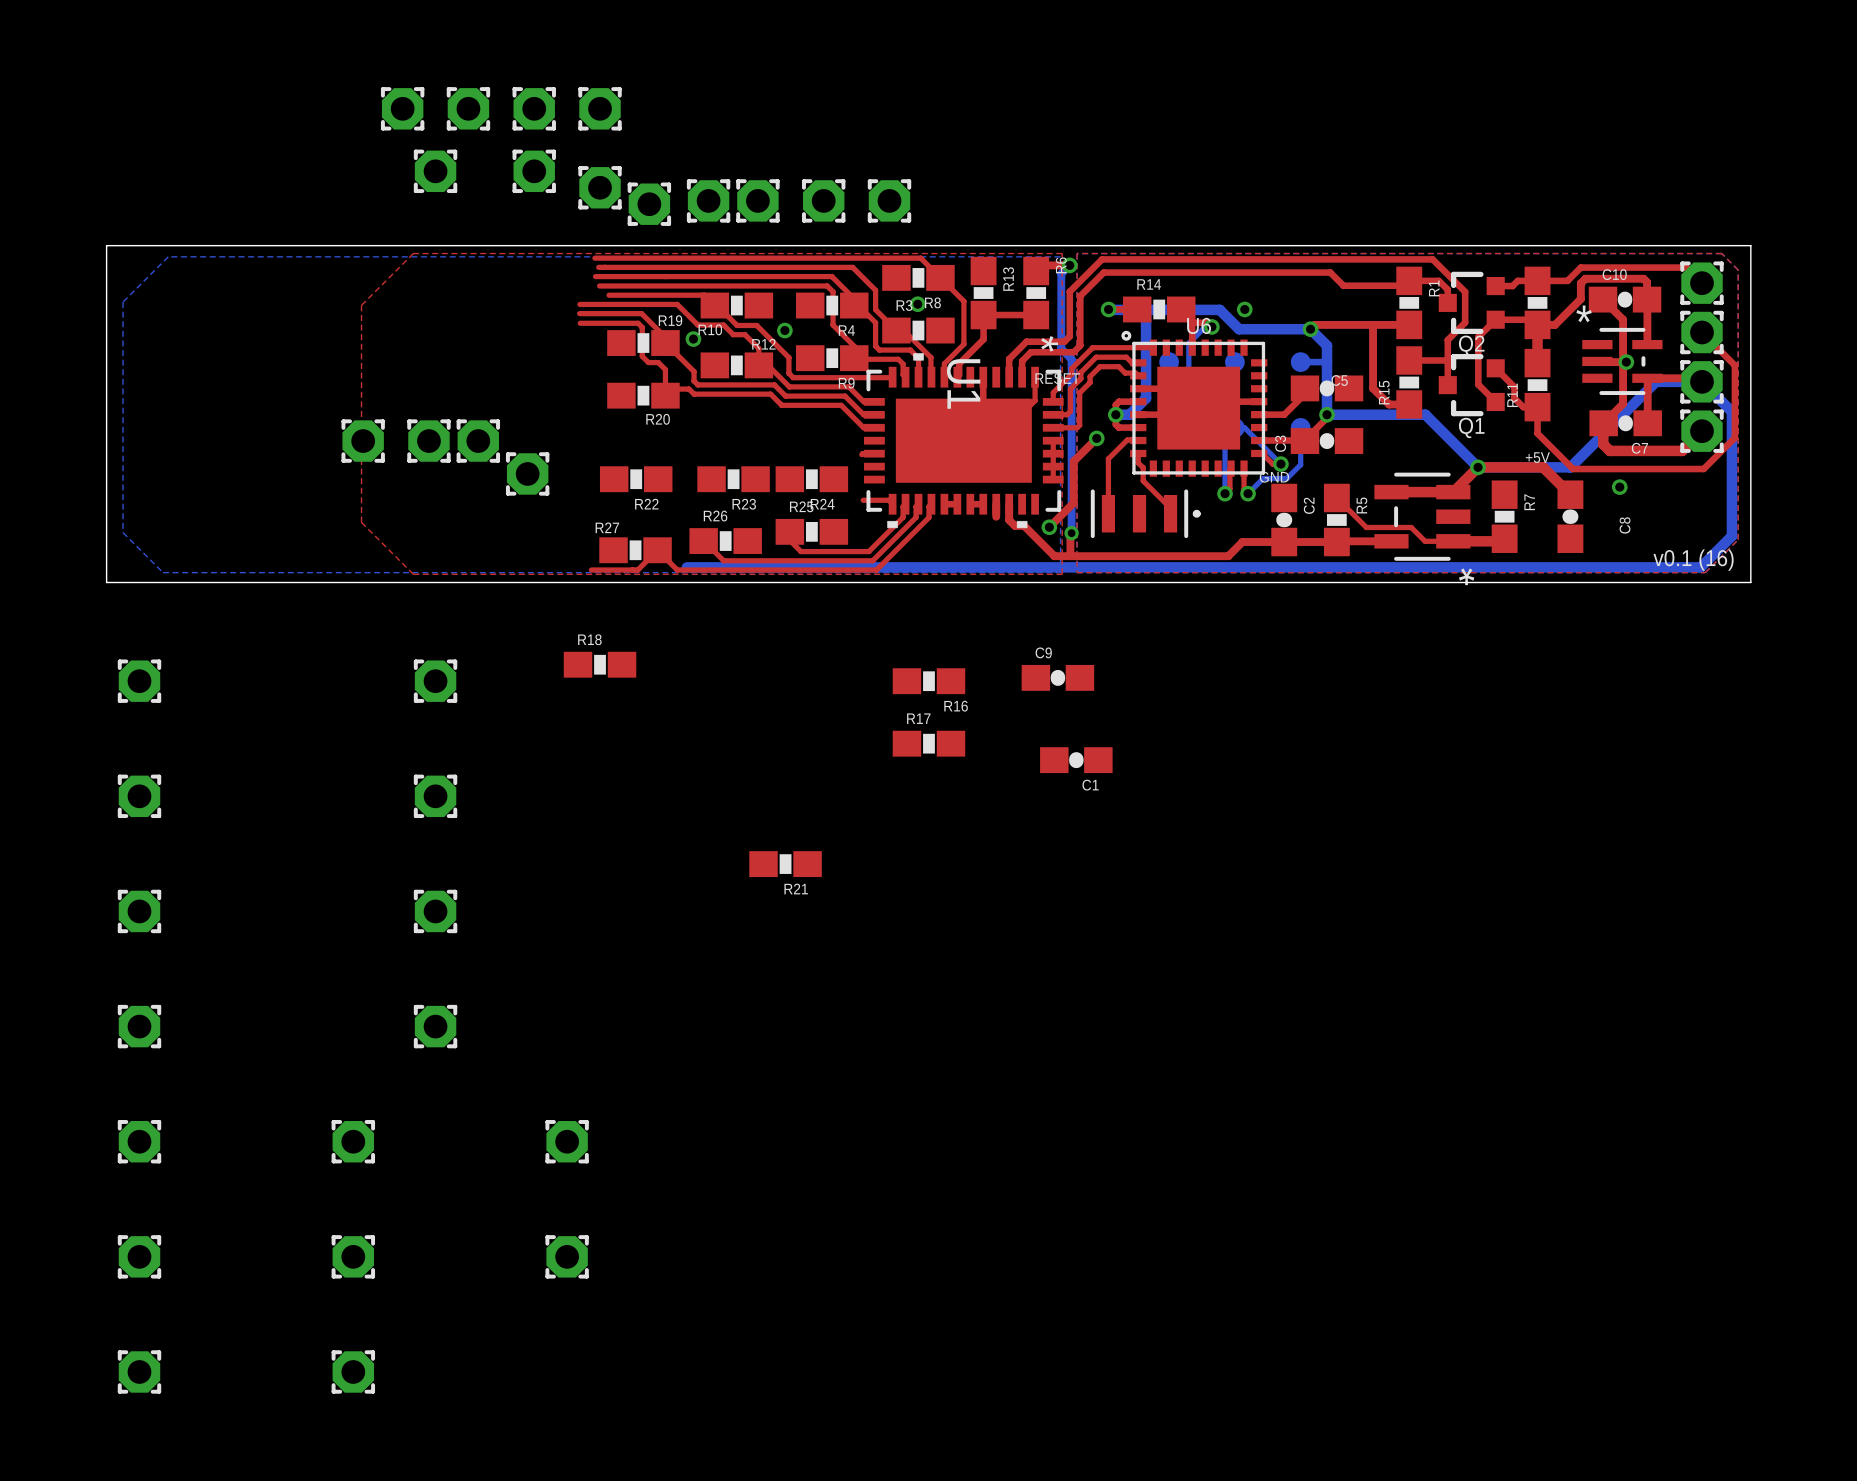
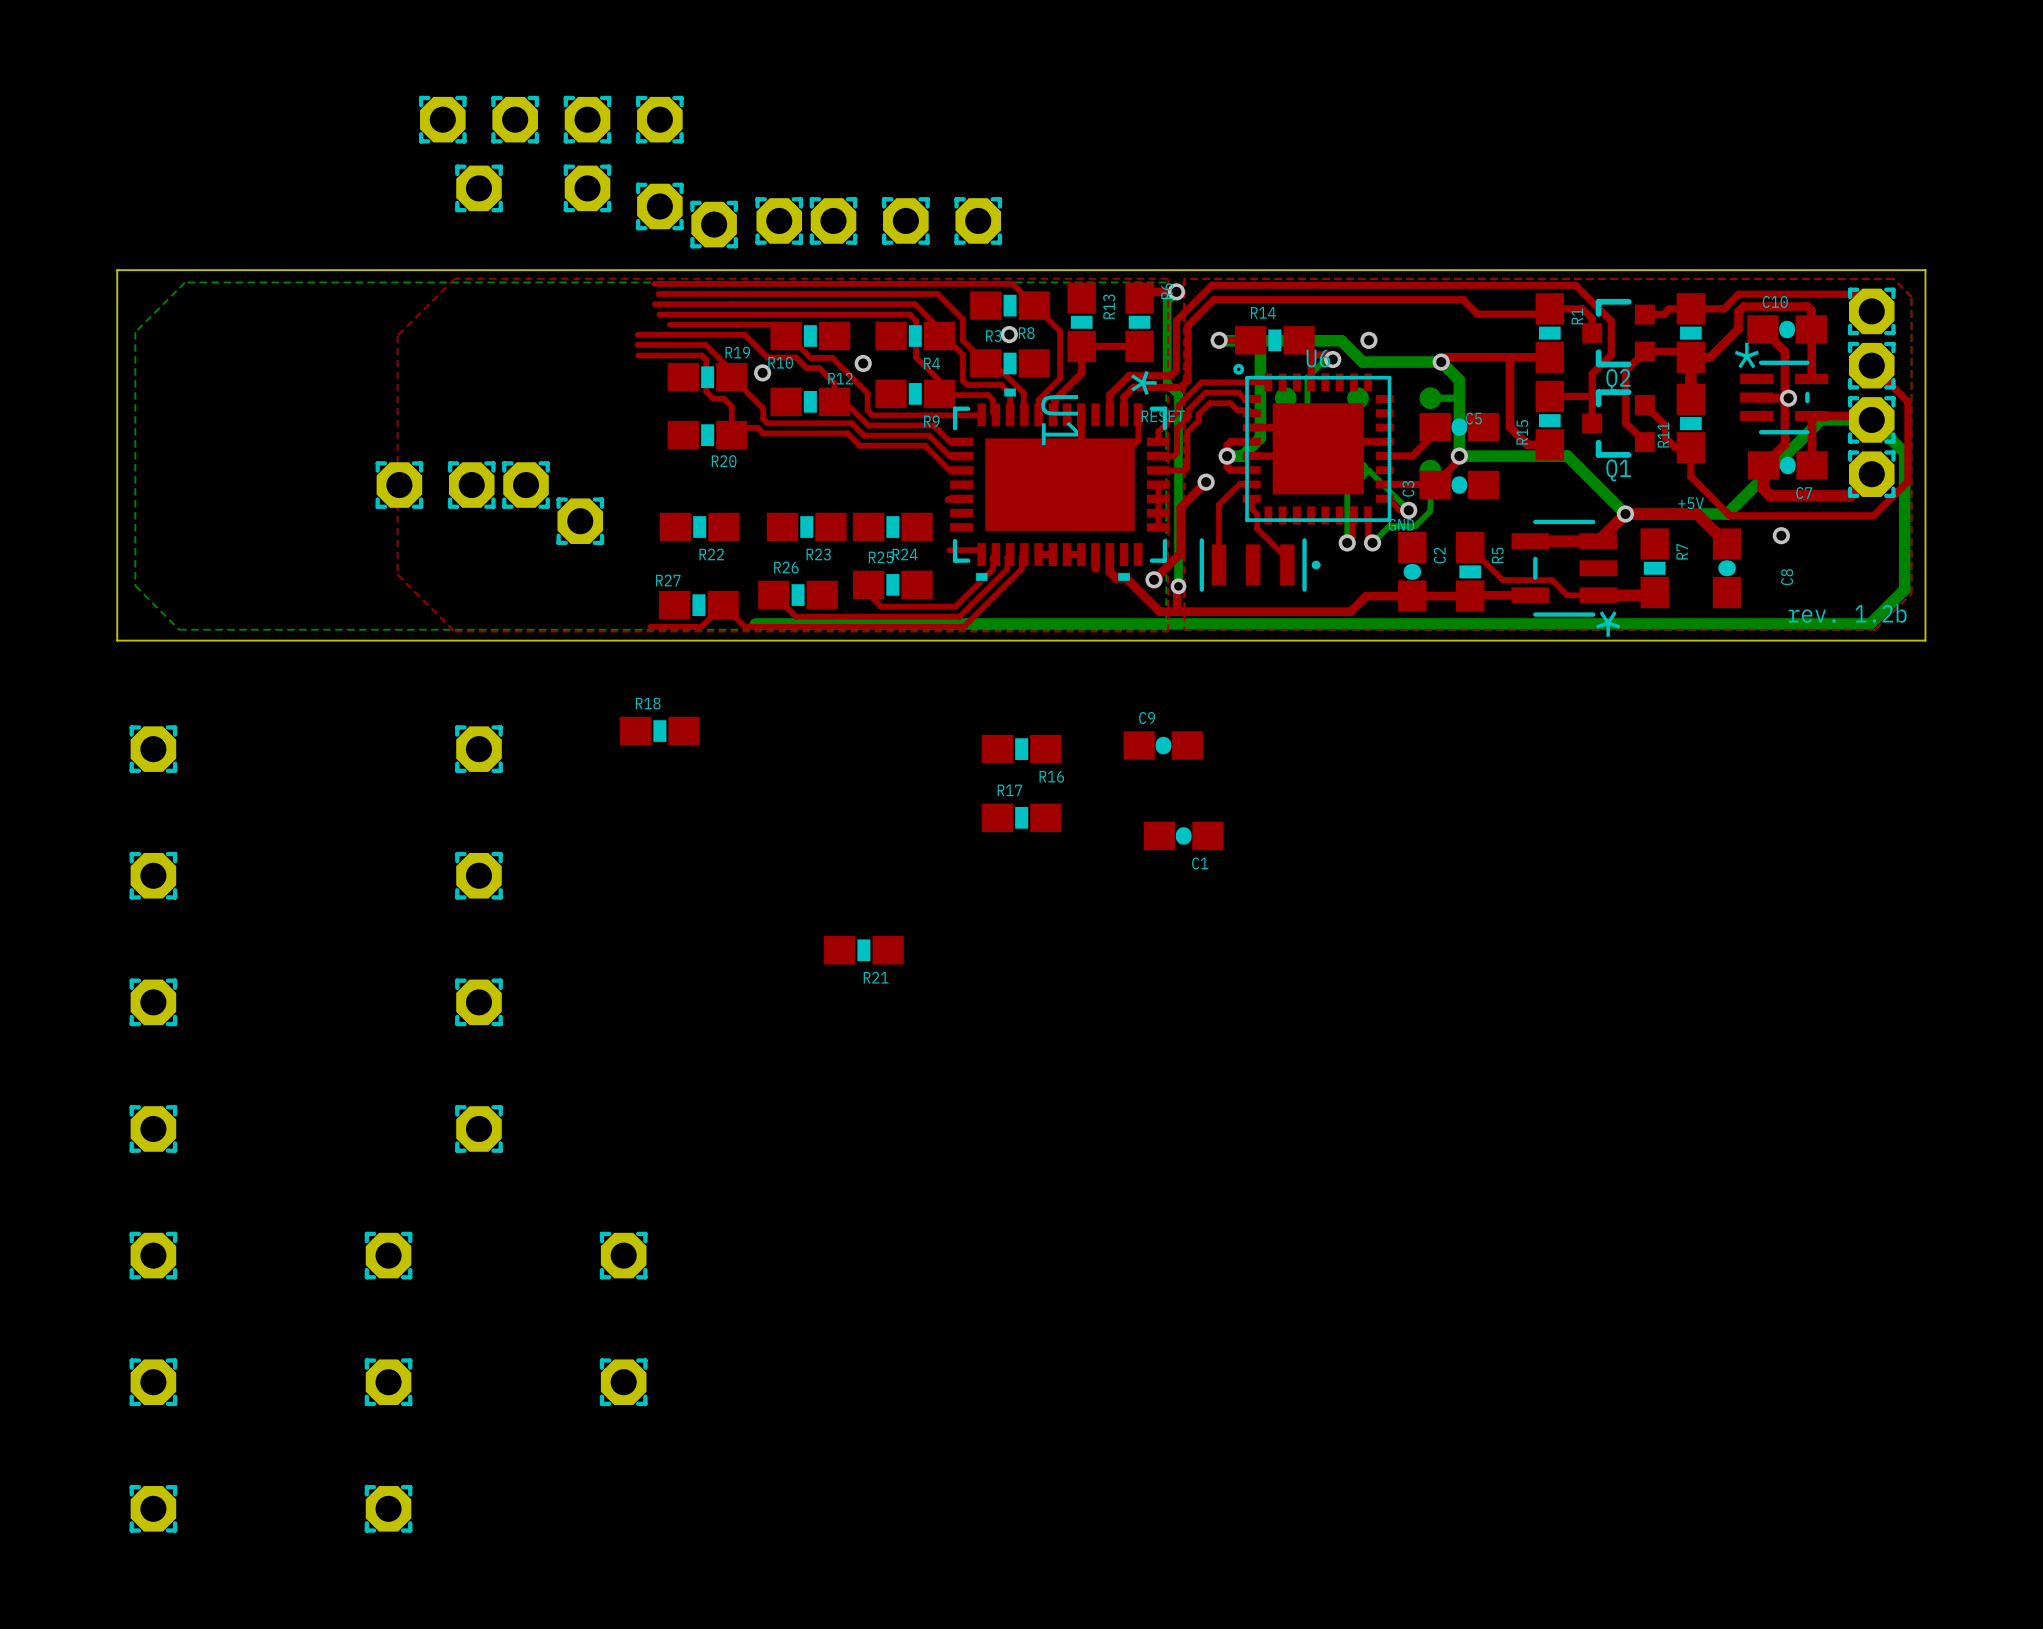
text: v0.1 (16) (1693, 560) -> rev. 1.2b (1847, 613)

